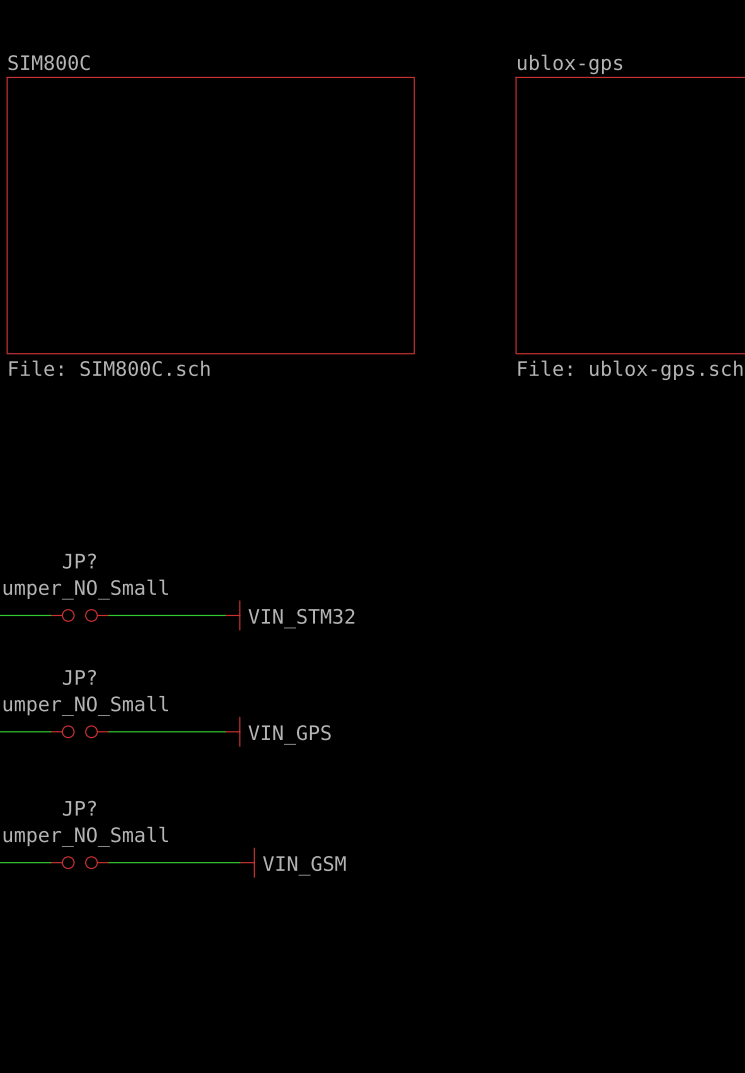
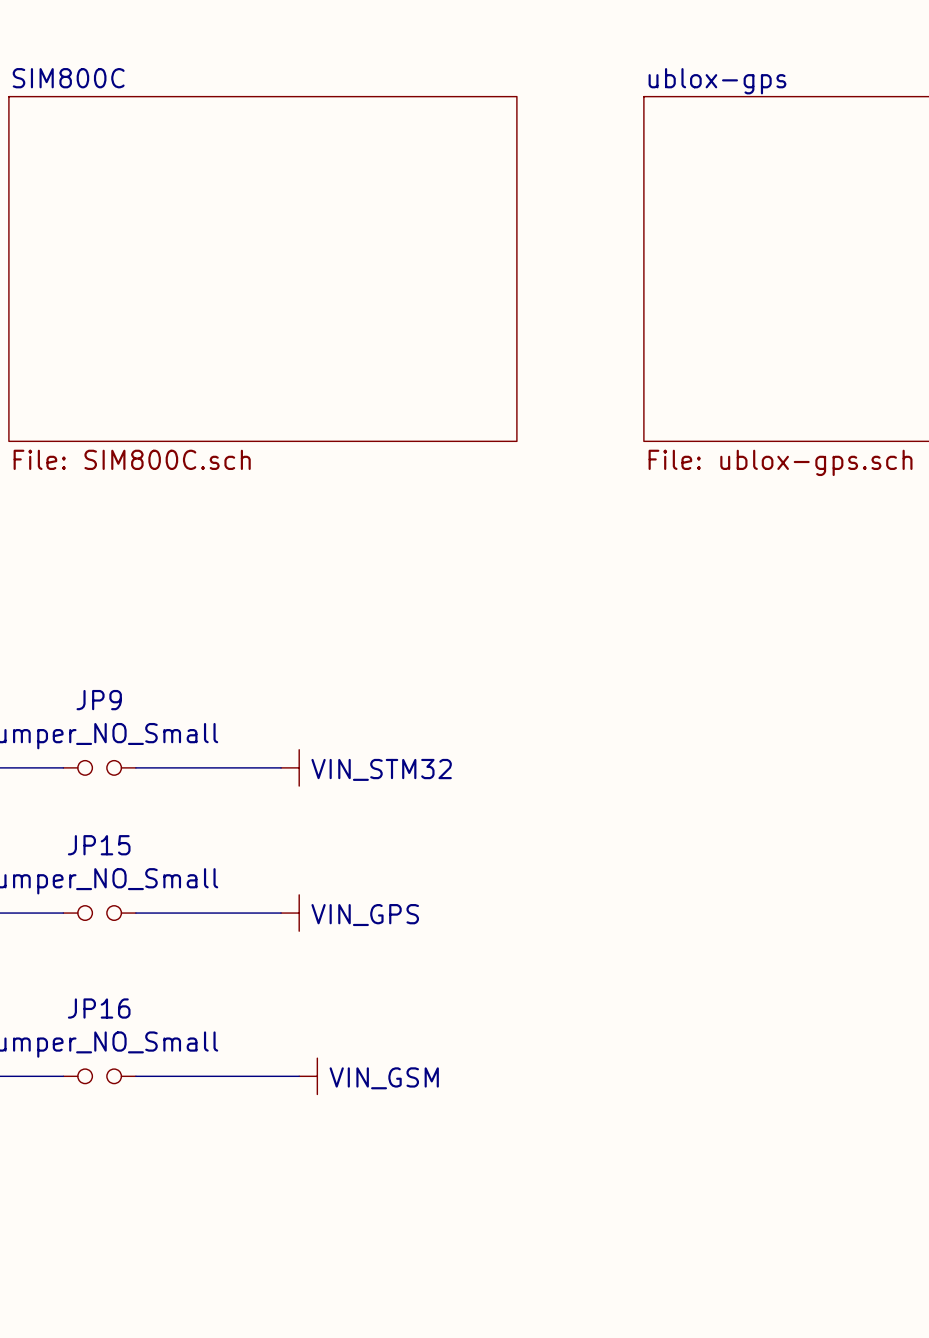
JP? name: JP? (79, 561) -> JP9 (99, 700)
JP? name: JP? (79, 677) -> JP15 (99, 845)
JP? name: JP? (79, 808) -> JP16 (99, 1008)

